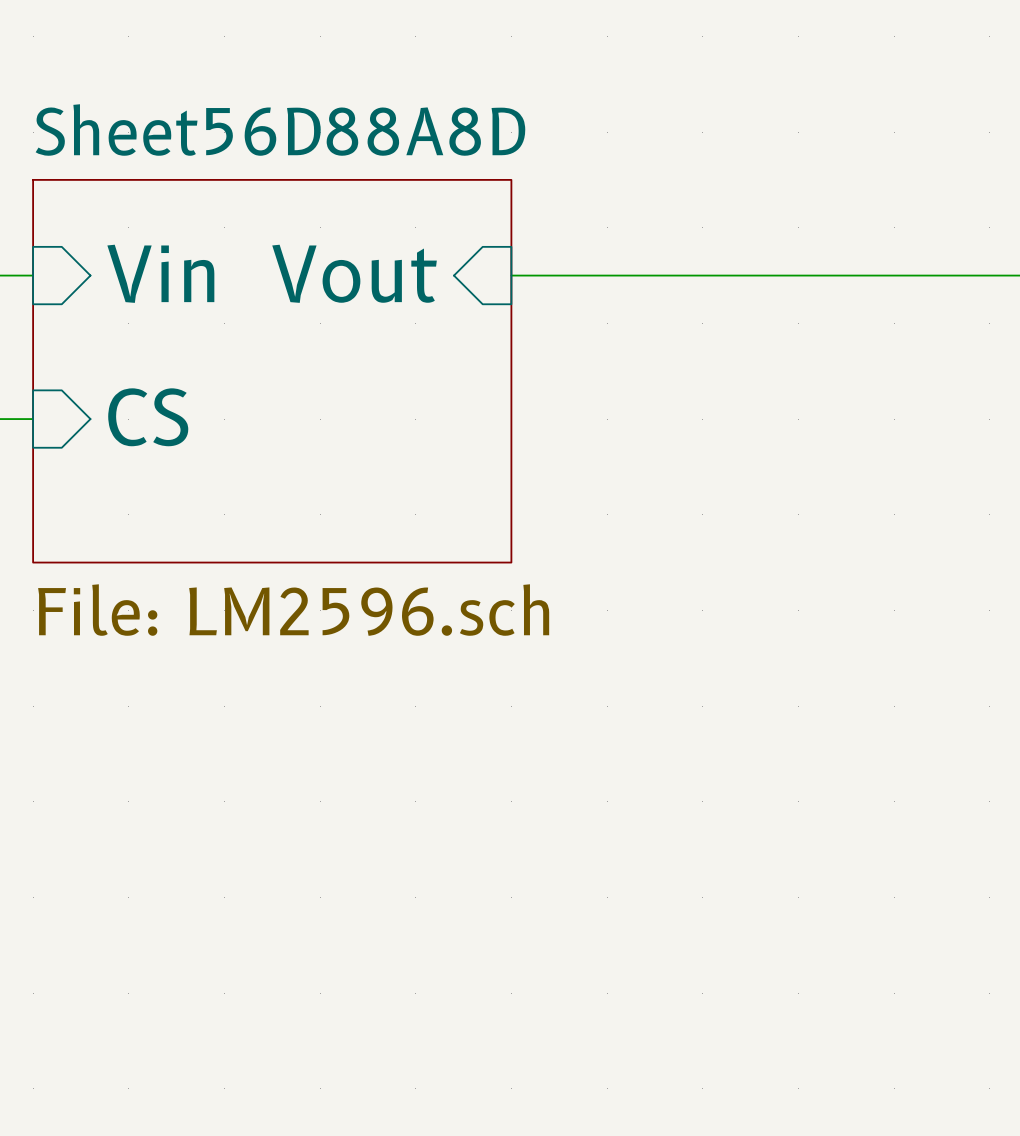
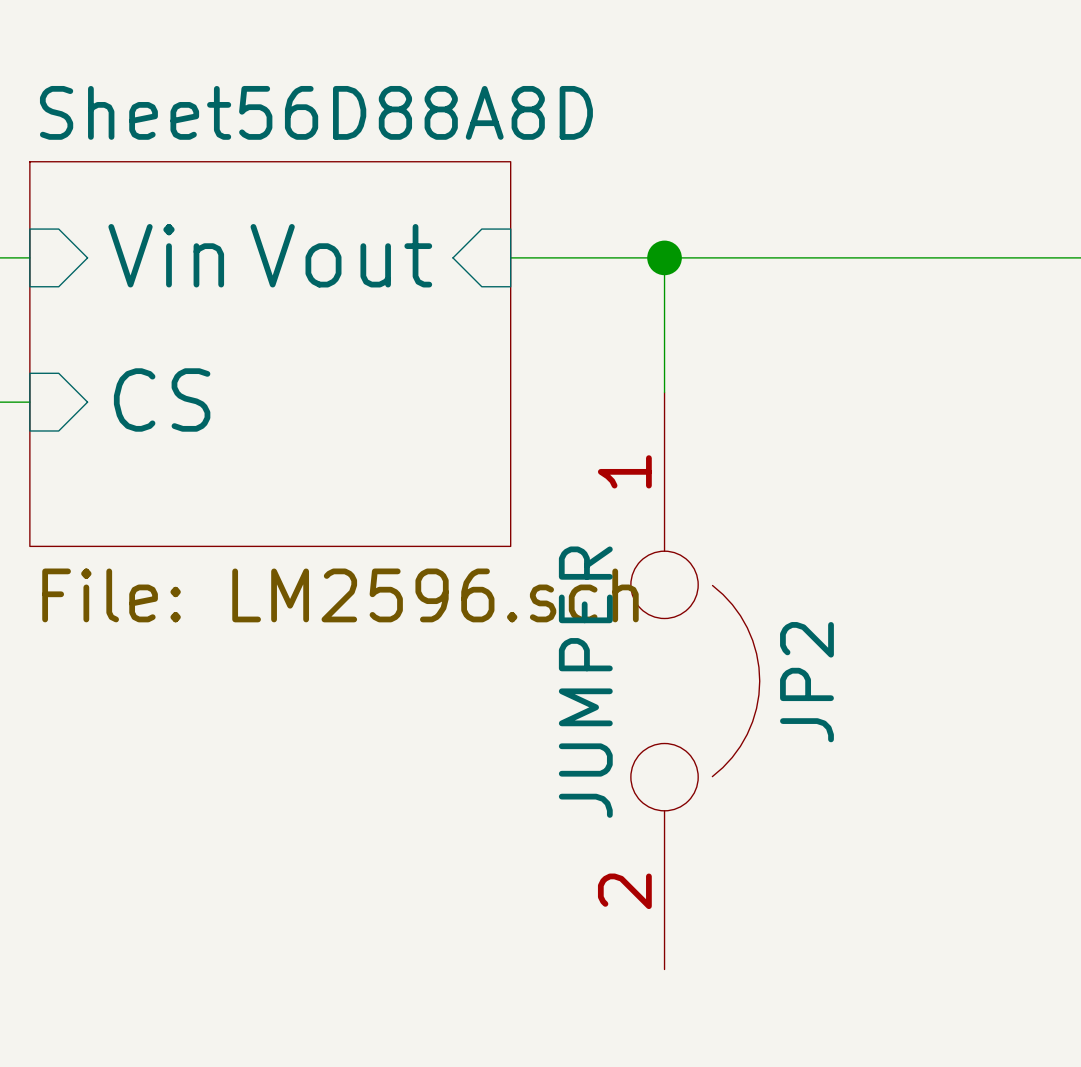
wire: none -> (664, 257) (664, 392)
junction: none -> (664, 257)
JP2: none -> JUMPER (695, 681)

